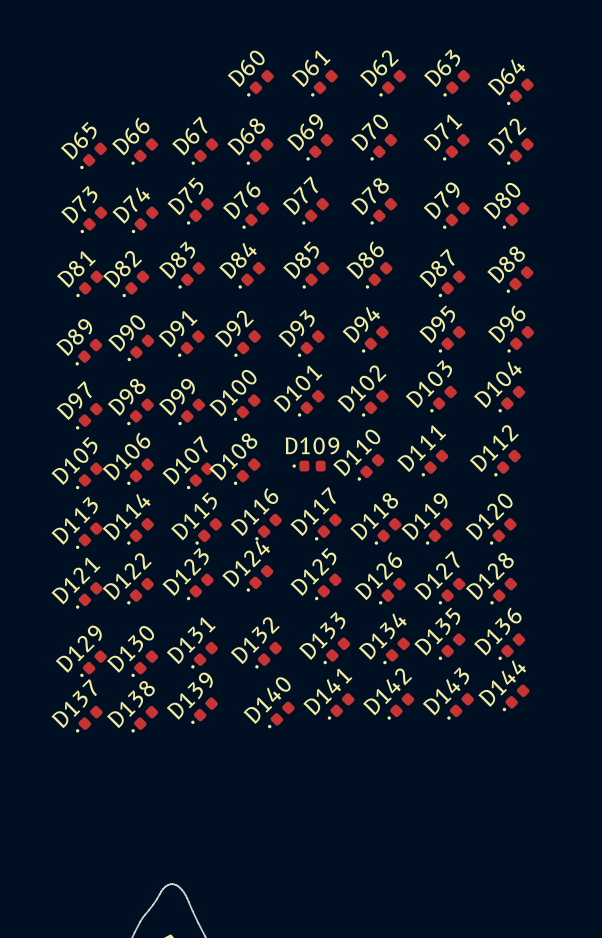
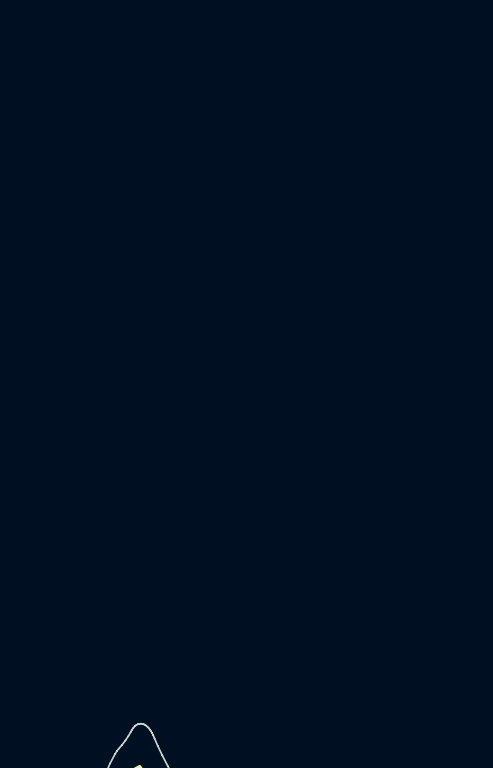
D60: (260, 83) -> none
D61: (324, 83) -> none
D62: (392, 83) -> none
D63: (456, 83) -> none
D64: (520, 91) -> none
D69: (319, 147) -> none
D70: (383, 147) -> none
D71: (456, 147) -> none
D66: (144, 151) -> none
D67: (204, 151) -> none
D68: (260, 151) -> none
D72: (520, 151) -> none
D65: (93, 155) -> none
D75: (200, 211) -> none
D77: (315, 211) -> none
D78: (383, 211) -> none
D76: (255, 215) -> none
D79: (456, 215) -> none
D80: (516, 215) -> none
D73: (93, 219) -> none
D74: (145, 219) -> none
D83: (191, 275) -> none
D84: (251, 275) -> none
D85: (315, 275) -> none
D86: (379, 275) -> none
D88: (519, 279) -> none
D81: (89, 283) -> none
D82: (135, 283) -> none
D87: (452, 283) -> none
D94: (375, 339) -> none
D95: (452, 339) -> none
D96: (520, 339) -> none
D91: (191, 343) -> none
D92: (247, 343) -> none
D93: (311, 343) -> none
D90: (140, 347) -> none
D89: (88, 352) -> none
D103: (443, 399) -> none
D104: (511, 399) -> none
D101: (311, 403) -> none
D102: (375, 403) -> none
D100: (247, 407) -> none
D98: (140, 411) -> none
D99: (191, 411) -> none
D97: (89, 416) -> none
D111: (435, 463) -> none
D112: (507, 463) -> none
D109: (309, 466) -> none
D110: (370, 467) -> none
D106: (140, 471) -> none
D108: (247, 471) -> none
D105: (89, 475) -> none
D107: (200, 475) -> none
D116: (268, 527) -> none
D117: (328, 527) -> none
D114: (140, 531) -> none
D115: (208, 531) -> none
D118: (388, 531) -> none
D119: (439, 531) -> none
D120: (503, 531) -> none
D113: (89, 535) -> none
D124: (260, 578) -> none
D123: (200, 586) -> none
D125: (328, 586) -> none
D122: (140, 591) -> none
D126: (392, 591) -> none
D127: (452, 591) -> none
D128: (503, 591) -> none
D121: (89, 595) -> none
D135: (452, 646) -> none
D136: (511, 646) -> none
D133: (336, 650) -> none
D134: (396, 650) -> none
D131: (204, 655) -> none
D132: (268, 655) -> none
D129: (93, 663) -> none
D130: (144, 663) -> none
D144: (516, 697) -> none
D141: (341, 706) -> none
D142: (400, 706) -> none
D143: (460, 706) -> none
D139: (204, 710) -> none
D140: (281, 714) -> none
D137: (89, 719) -> none
D138: (144, 719) -> none

